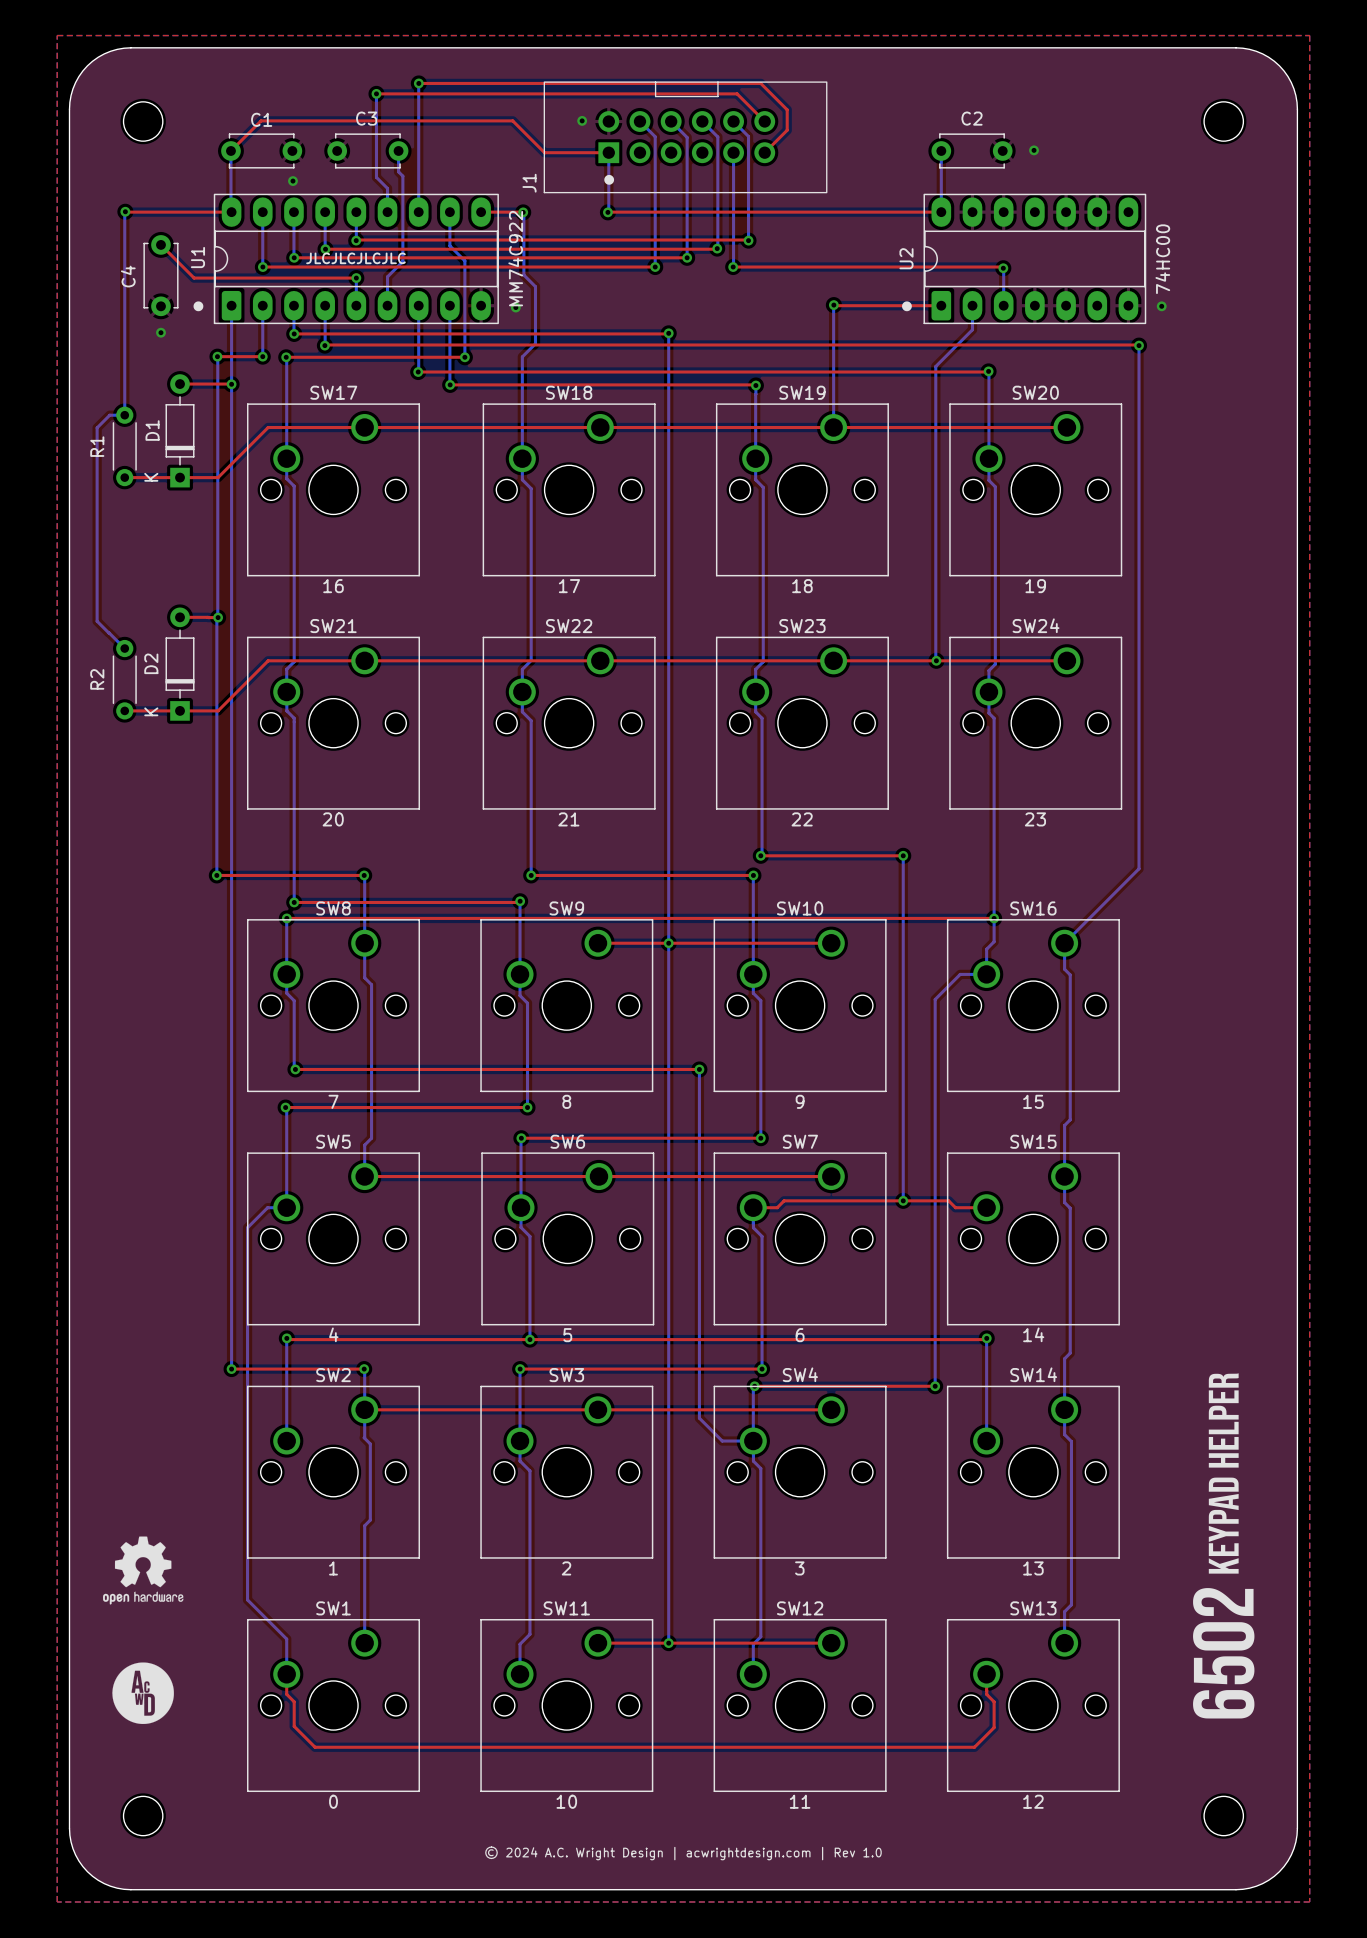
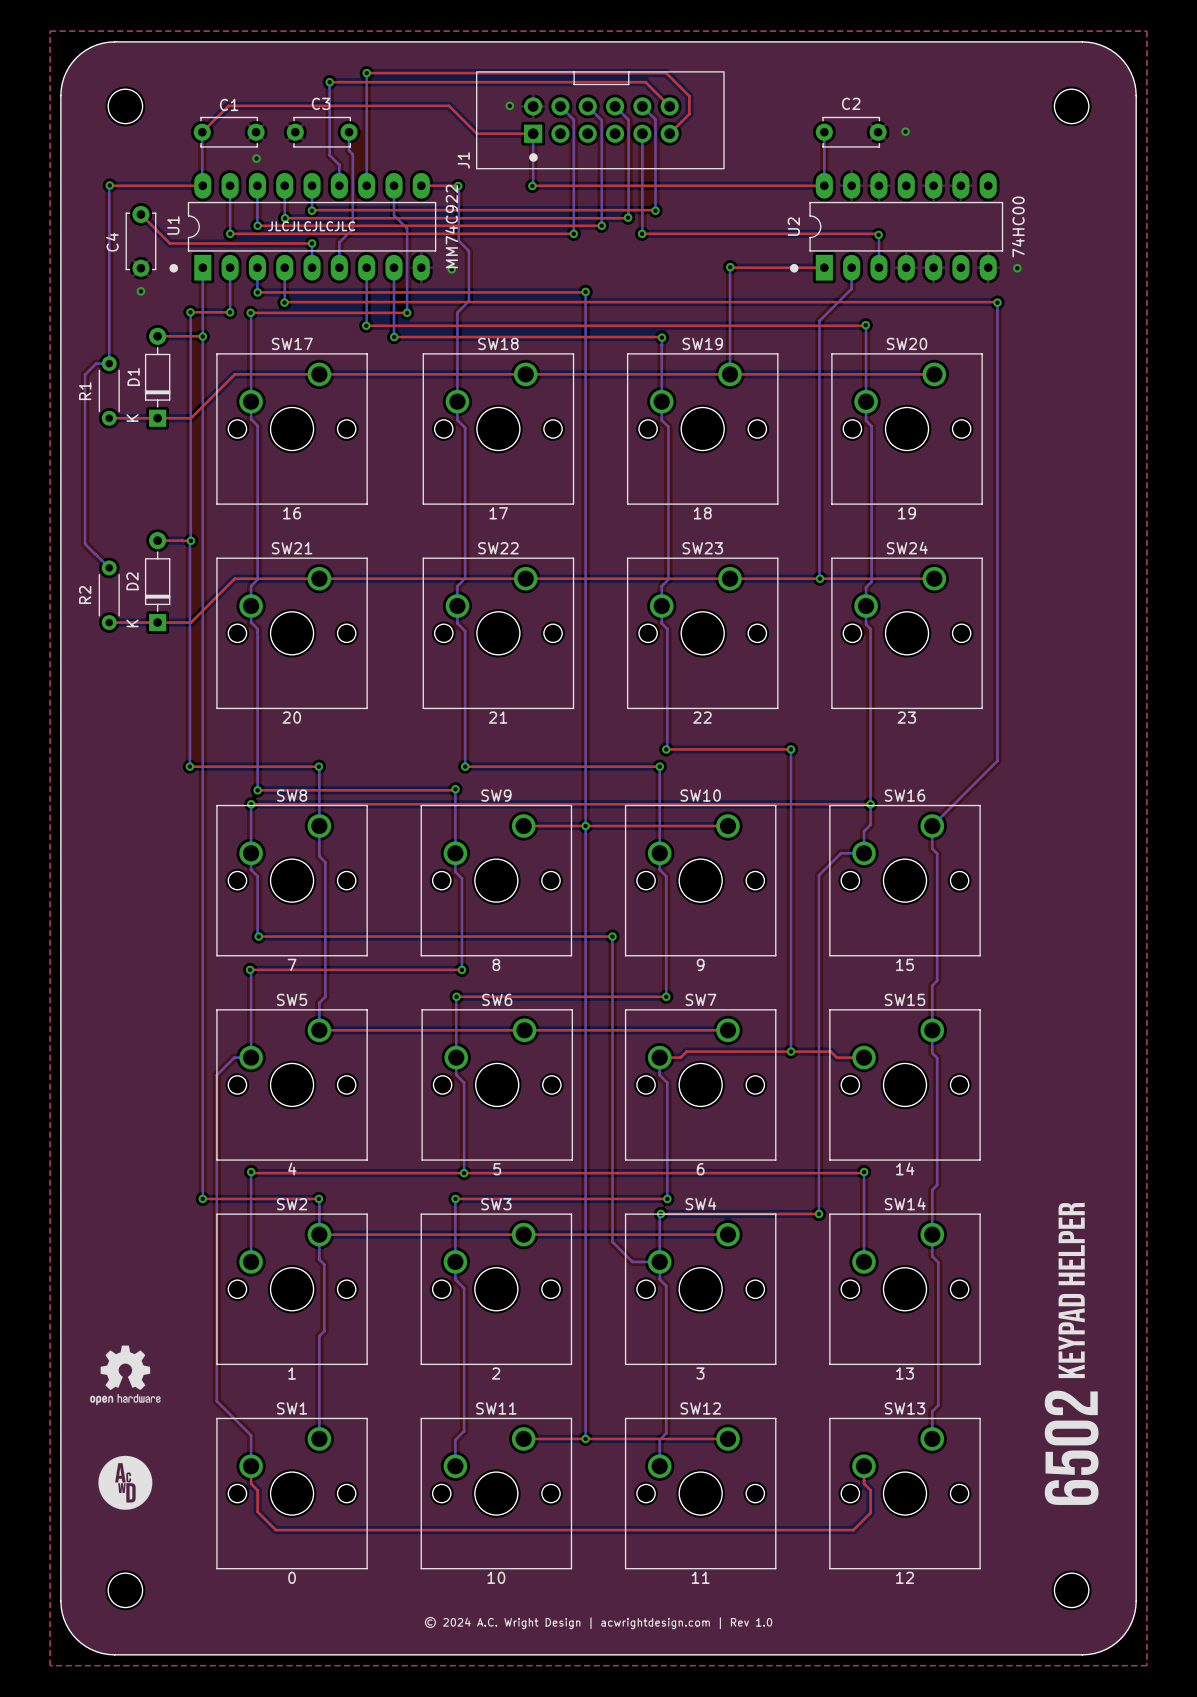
U1 footprint: [213, 193, 499, 325] -> [187, 172, 437, 281]
U2 footprint: [923, 193, 1147, 325] -> [809, 172, 1004, 281]

